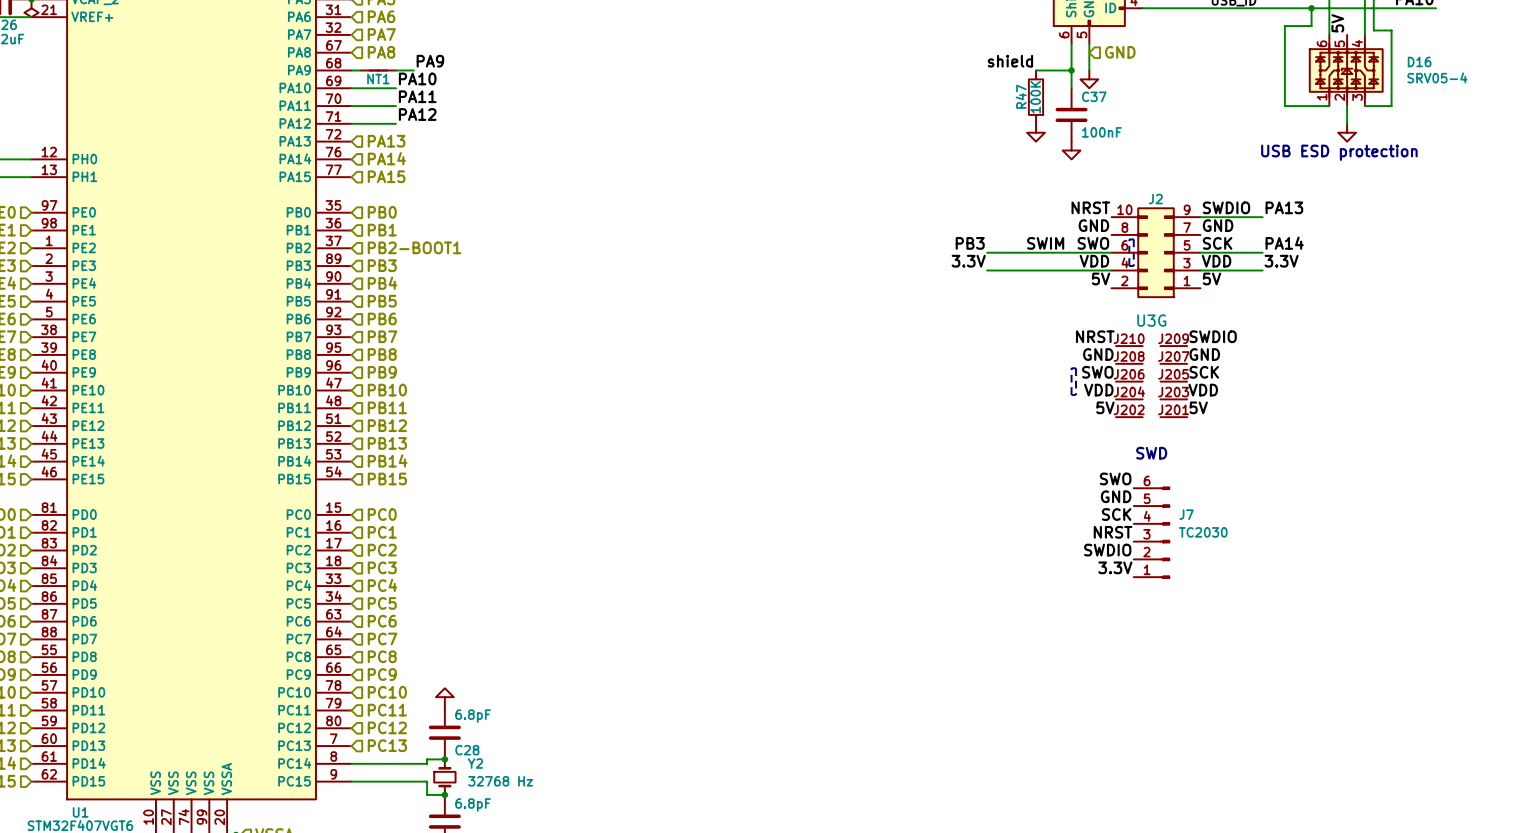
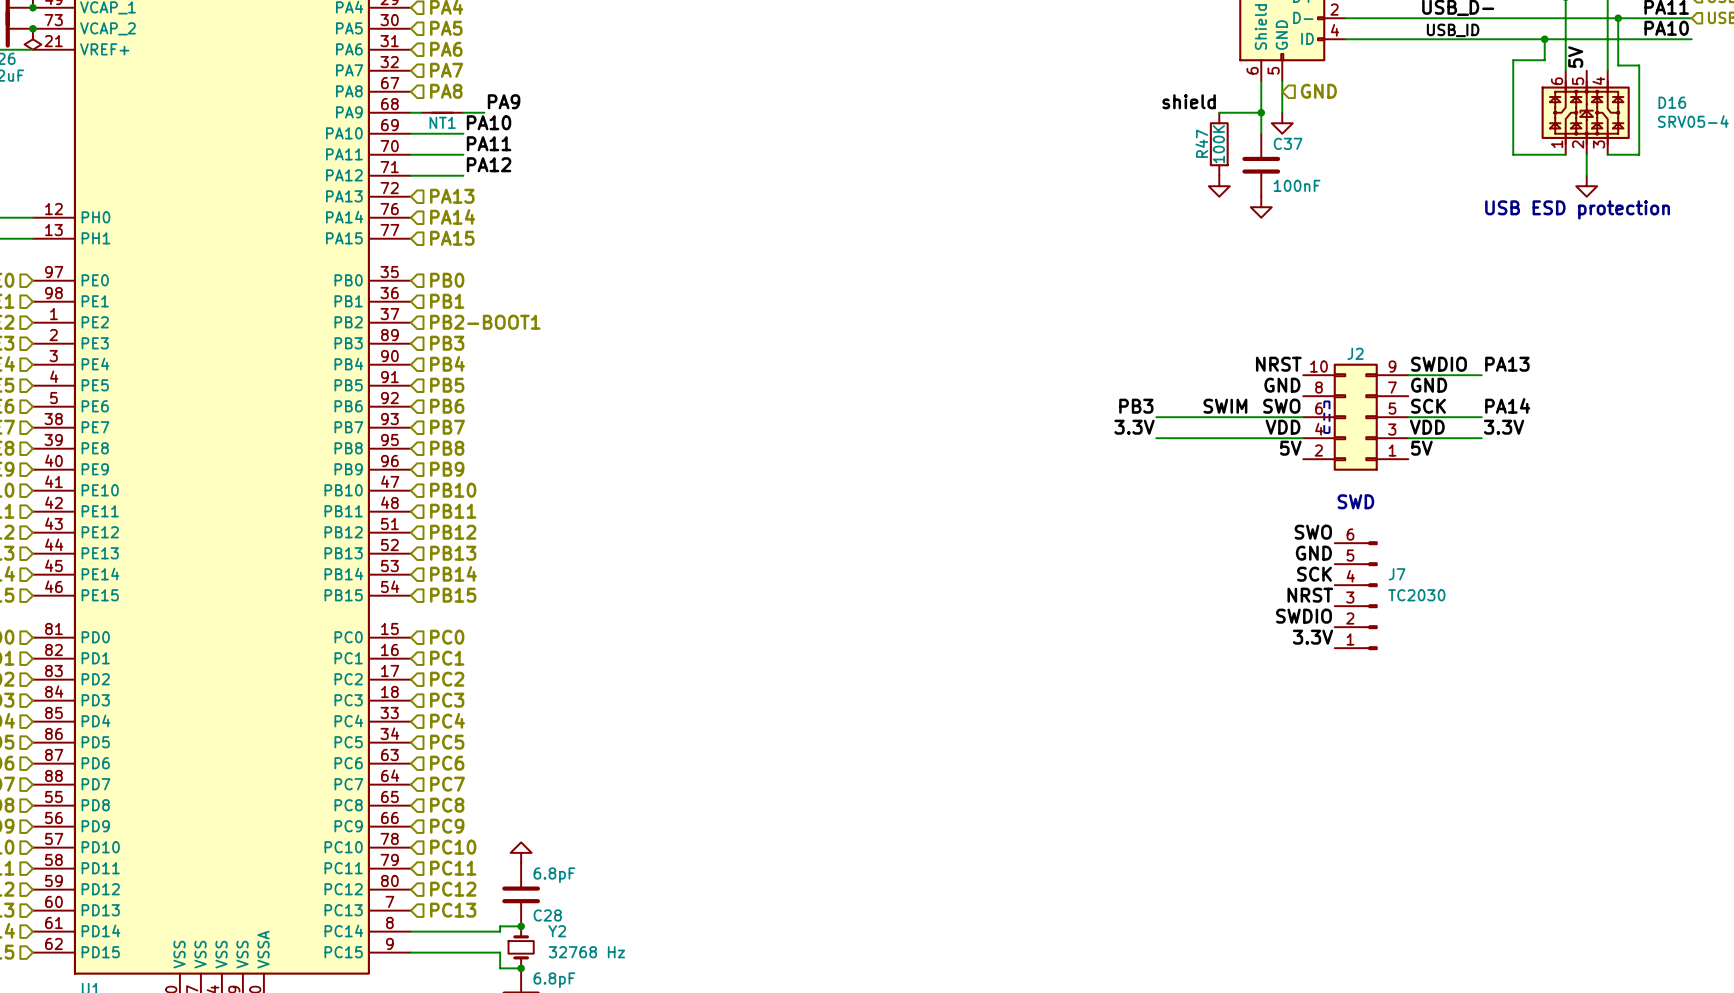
label: NRST (1090, 207) -> none
label: SWDIO (1226, 207) -> none
label position: PA13 (1284, 207) -> PA13 (1507, 364)
wire: (1200, 217) (1262, 217) -> (1408, 375) (1481, 375)
label: GND (1093, 225) -> none
label: GND (1218, 225) -> none
line: (1129, 239) (1133, 239) (1133, 266) (1129, 266) (1129, 239) -> none
label position: PB3 (970, 243) -> PB3 (1136, 406)
label position: SWIM (1045, 243) -> SWIM (1225, 406)
label: SWO (1093, 243) -> none
label: SCK (1217, 243) -> none
label position: PA14 (1284, 243) -> PA14 (1507, 405)
wire: (987, 252) (1111, 252) -> (1156, 417) (1303, 417)
J2 position: (1156, 252) -> (1355, 417)
wire: (1200, 252) (1262, 252) -> (1408, 417) (1481, 417)
label position: 3.3V (968, 261) -> 3.3V (1134, 427)
label: VDD (1094, 261) -> none
label: VDD (1216, 261) -> none
label position: 3.3V (1281, 261) -> 3.3V (1504, 427)
wire: (987, 270) (1111, 270) -> (1156, 438) (1303, 438)
wire: (1200, 270) (1262, 270) -> (1408, 438) (1481, 438)
label: 5V (1101, 278) -> NRST (1278, 364)
label: 5V (1212, 278) -> SWDIO (1439, 364)
label: none -> GND (1282, 385)
label: none -> GND (1429, 385)
label: none -> SWO (1281, 406)
label: none -> SCK (1428, 406)
label: none -> VDD (1283, 427)
label: NRST (1095, 336) -> none
label: none -> VDD (1427, 427)
label: SWDIO (1213, 336) -> none
label: none -> 5V (1290, 448)
label: GND (1098, 354) -> none
label: GND (1204, 354) -> none
label: none -> 5V (1421, 448)
line: (1071, 368) (1076, 368) (1076, 394) (1071, 394) (1071, 368) -> (1324, 401) (1329, 401) (1329, 432) (1324, 432) (1324, 401)
label: SWO (1097, 372) -> none
label: SCK (1204, 372) -> none
U3G: (1151, 381) -> none
label: VDD (1098, 390) -> none
label: VDD (1203, 390) -> none
label: 5V (1105, 407) -> none
label: 5V (1198, 407) -> none
label: none -> SWO (1313, 532)
label: none -> GND (1313, 553)
text position: SWD (1151, 453) -> SWD (1355, 501)
label: none -> SCK (1314, 574)
label: SWO (1115, 478) -> NRST (1310, 595)
label: GND (1116, 496) -> SWDIO (1304, 616)
label: SCK (1116, 514) -> 3.3V (1313, 637)
label: NRST (1113, 532) -> none
J7 position: (1151, 532) -> (1356, 595)
label: SWDIO (1107, 550) -> none
label: 3.3V (1115, 567) -> none

